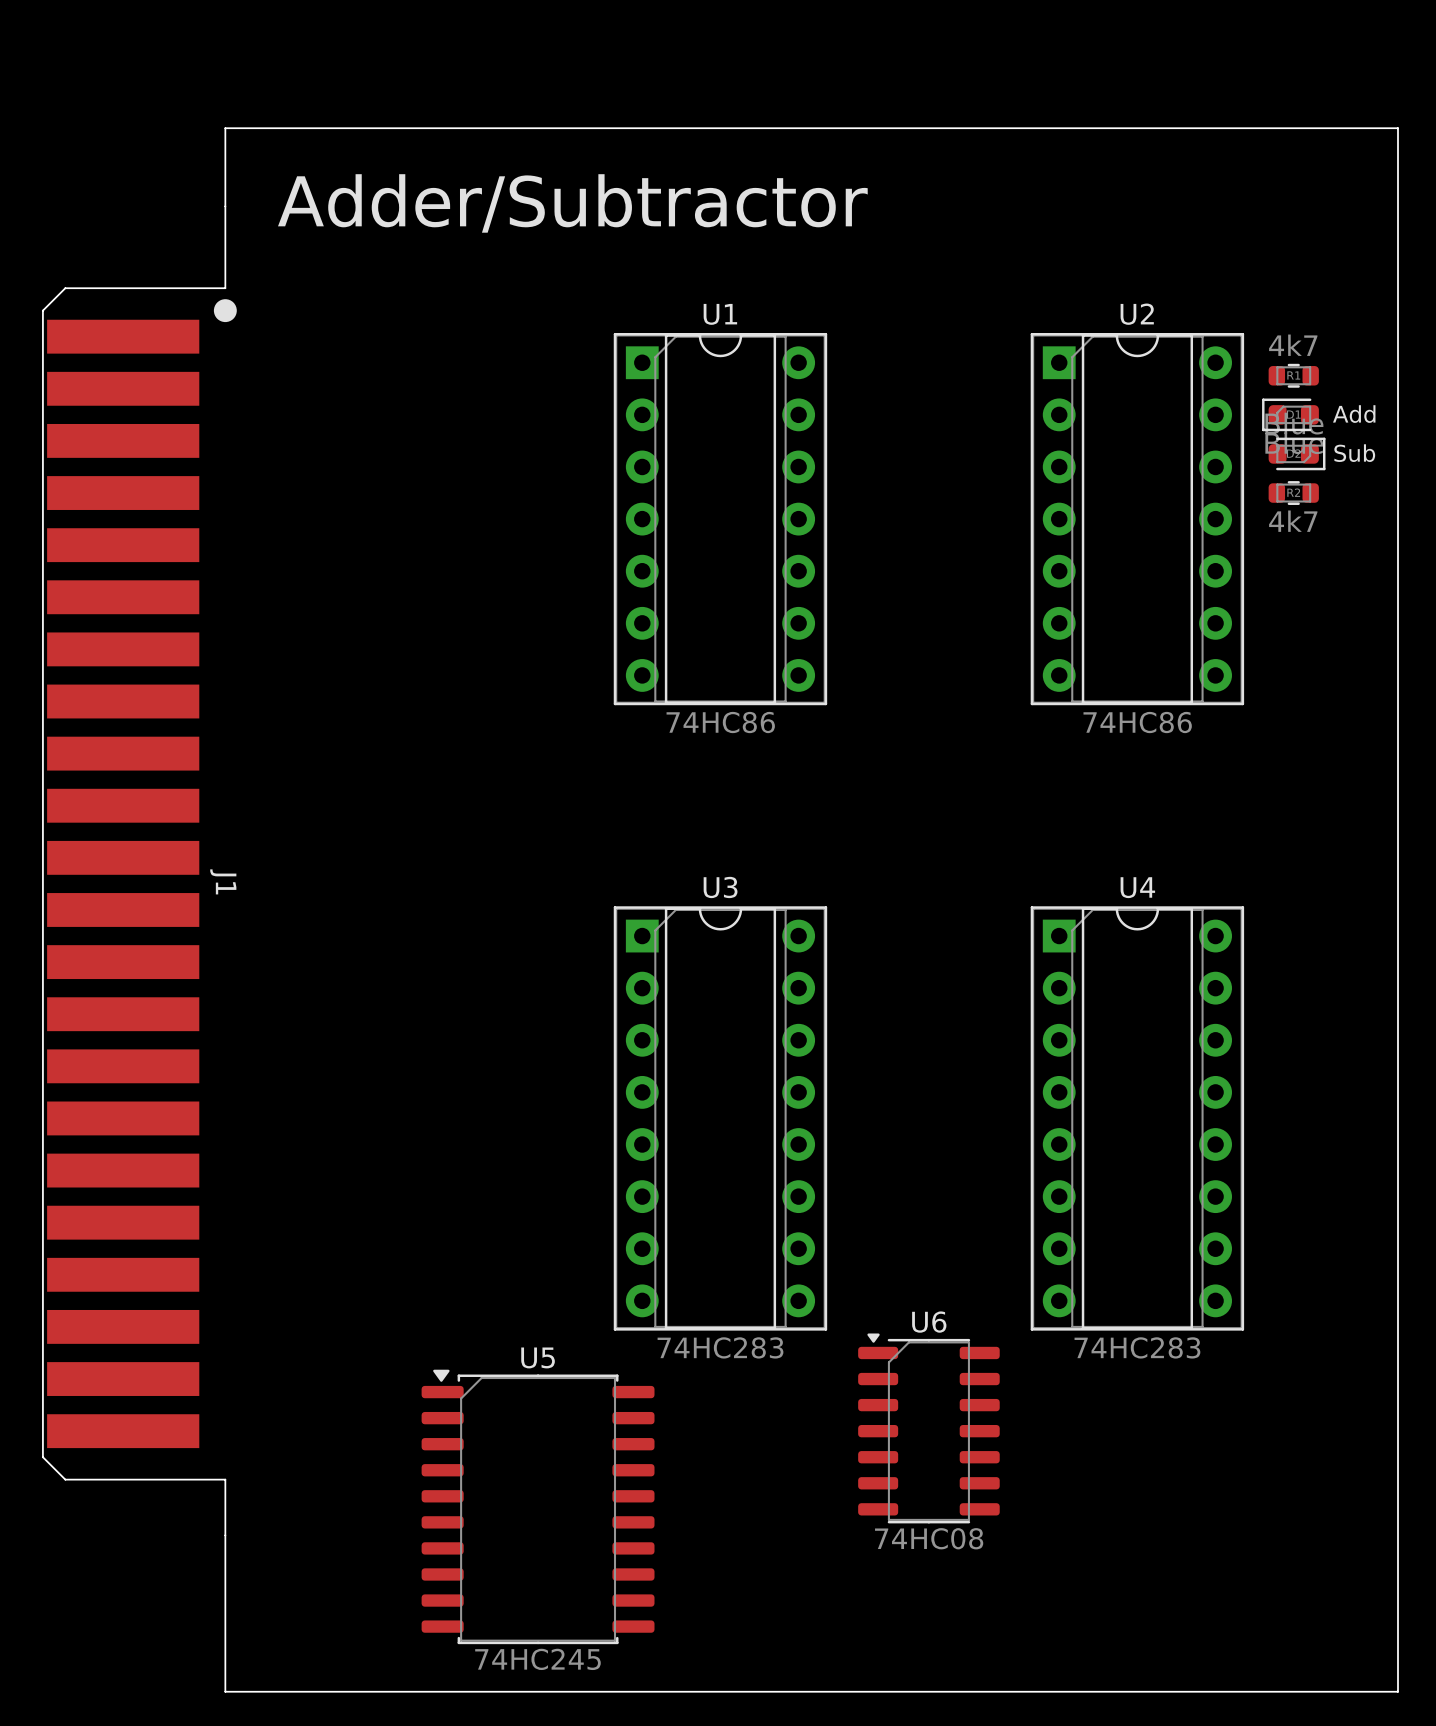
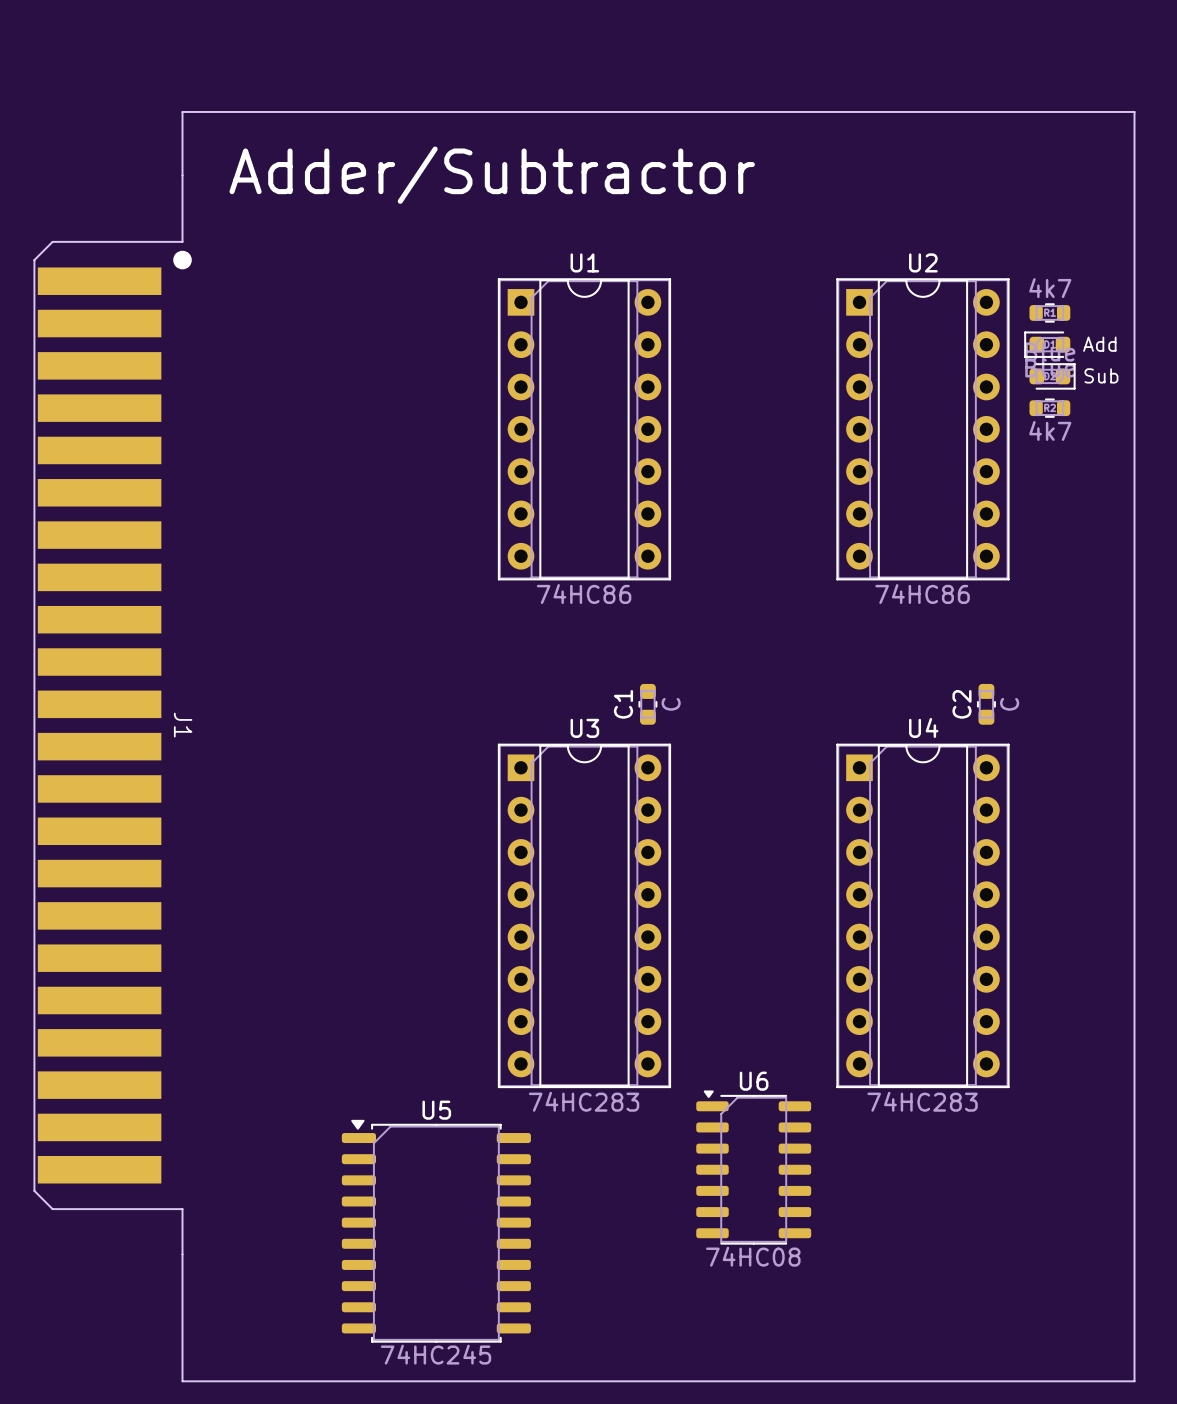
C1: none -> C (647, 704)
C2: none -> C (986, 704)

